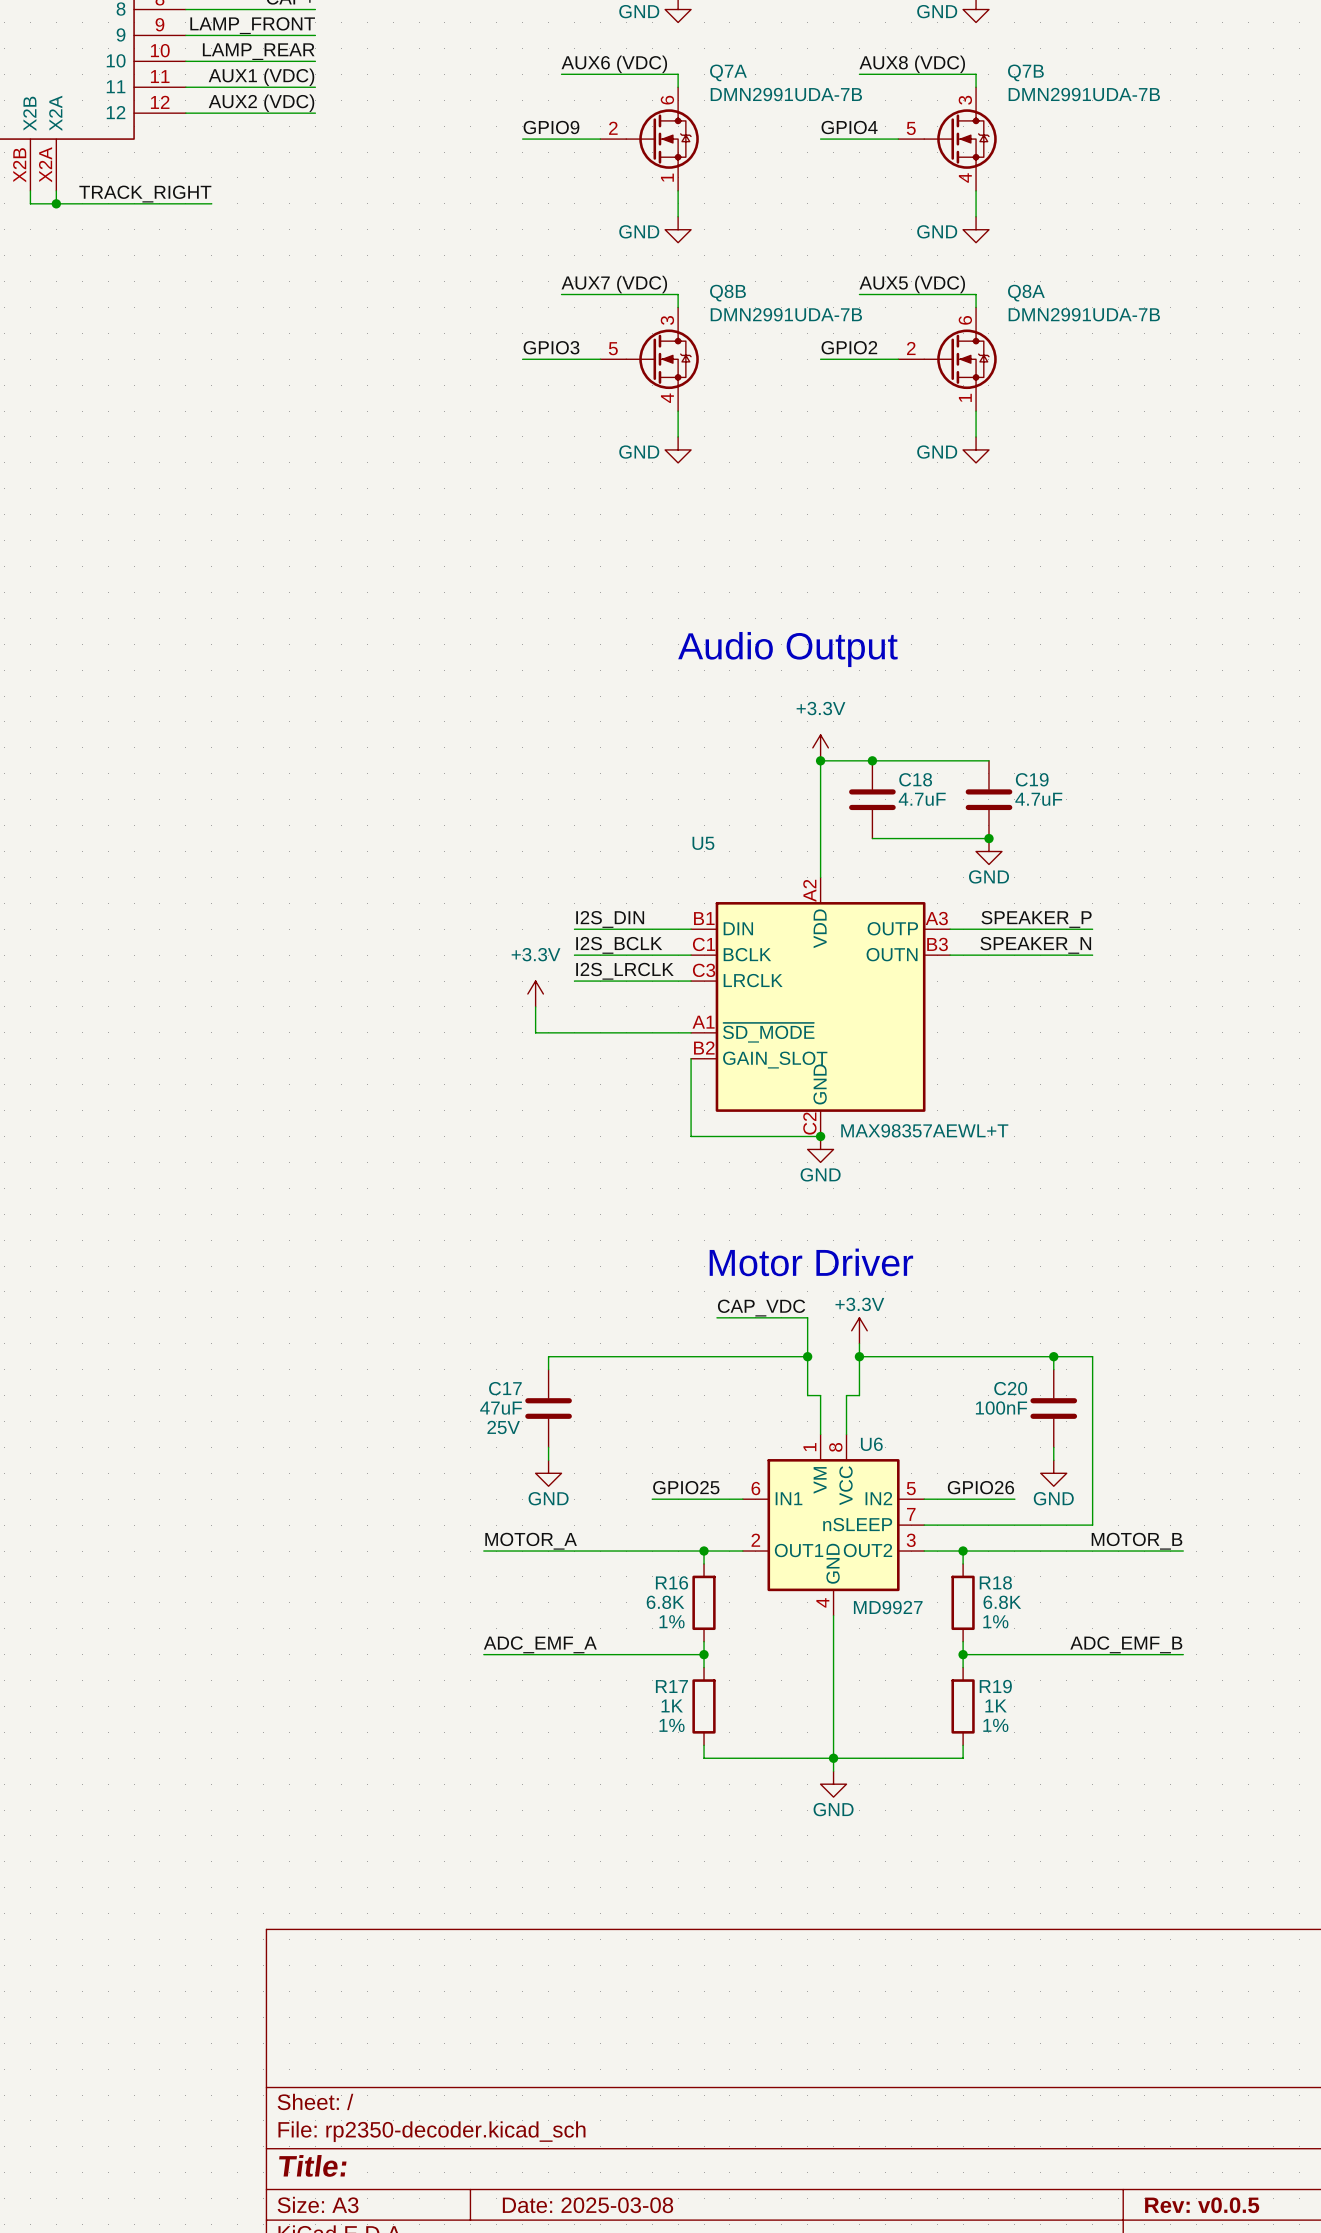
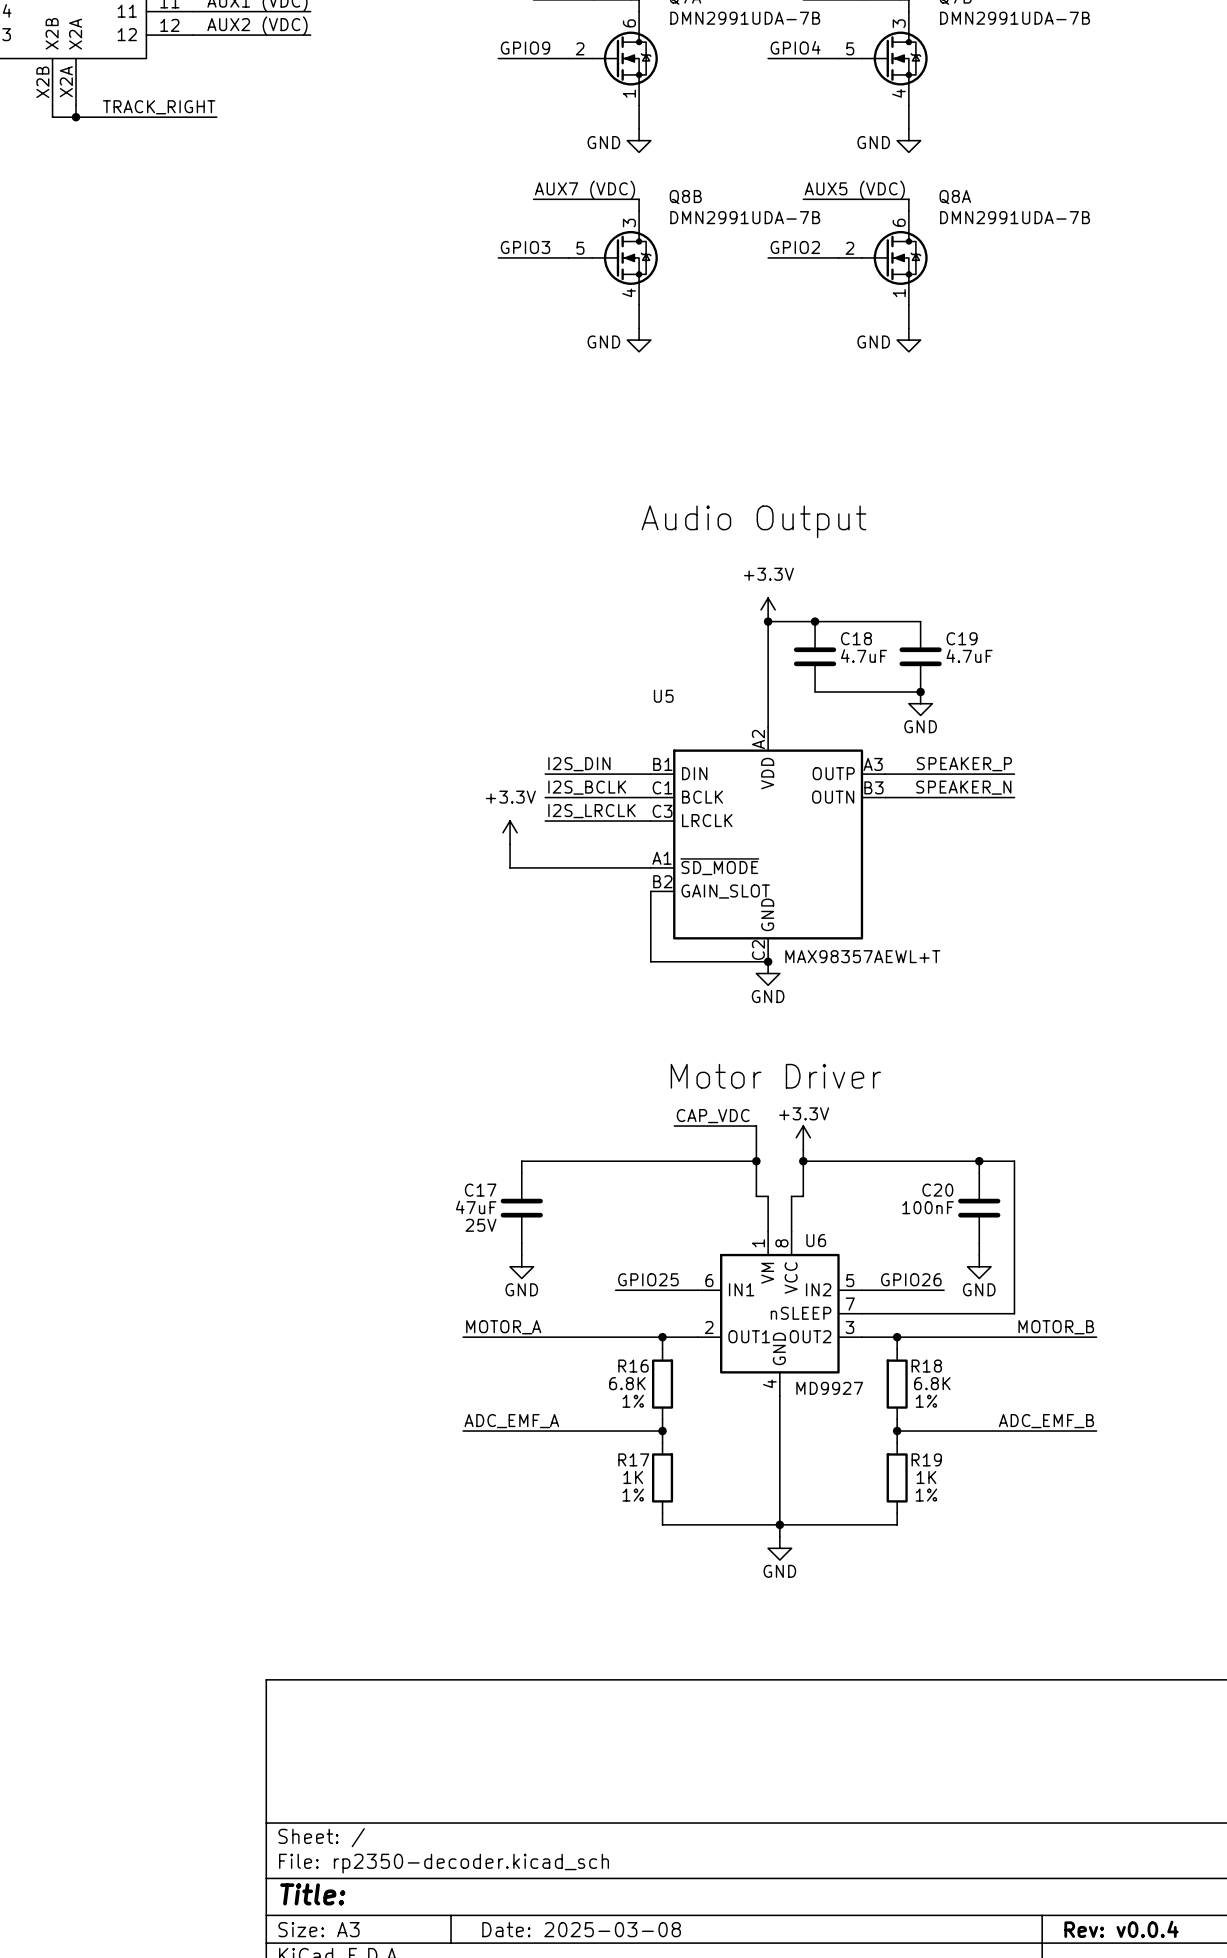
title block: Rev: v0.0.5 (1202, 2205) -> Rev: v0.0.4 (1121, 1929)

